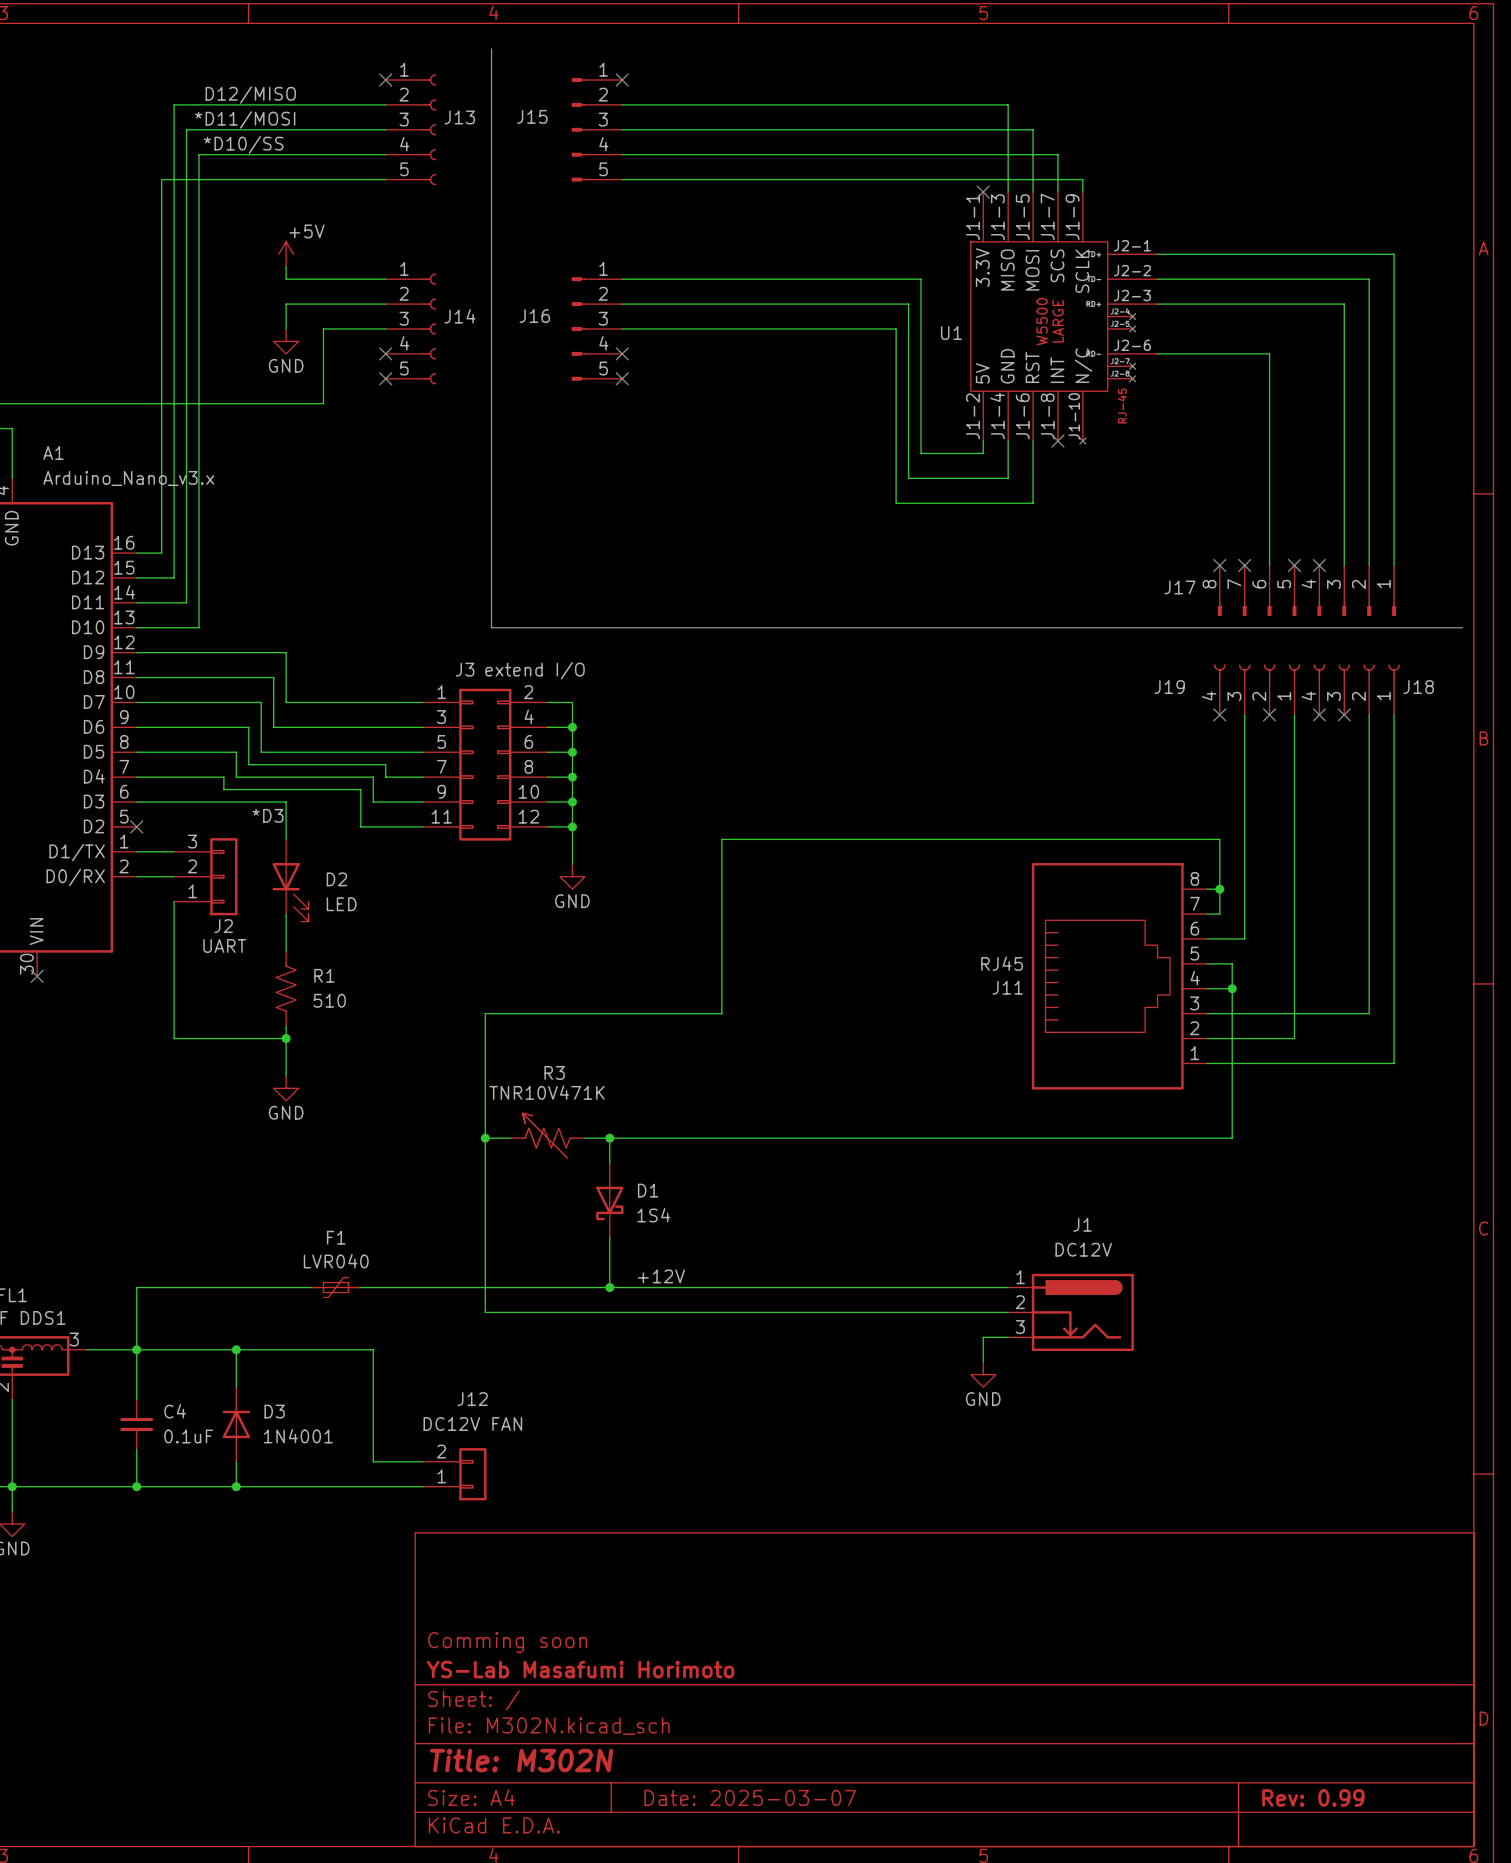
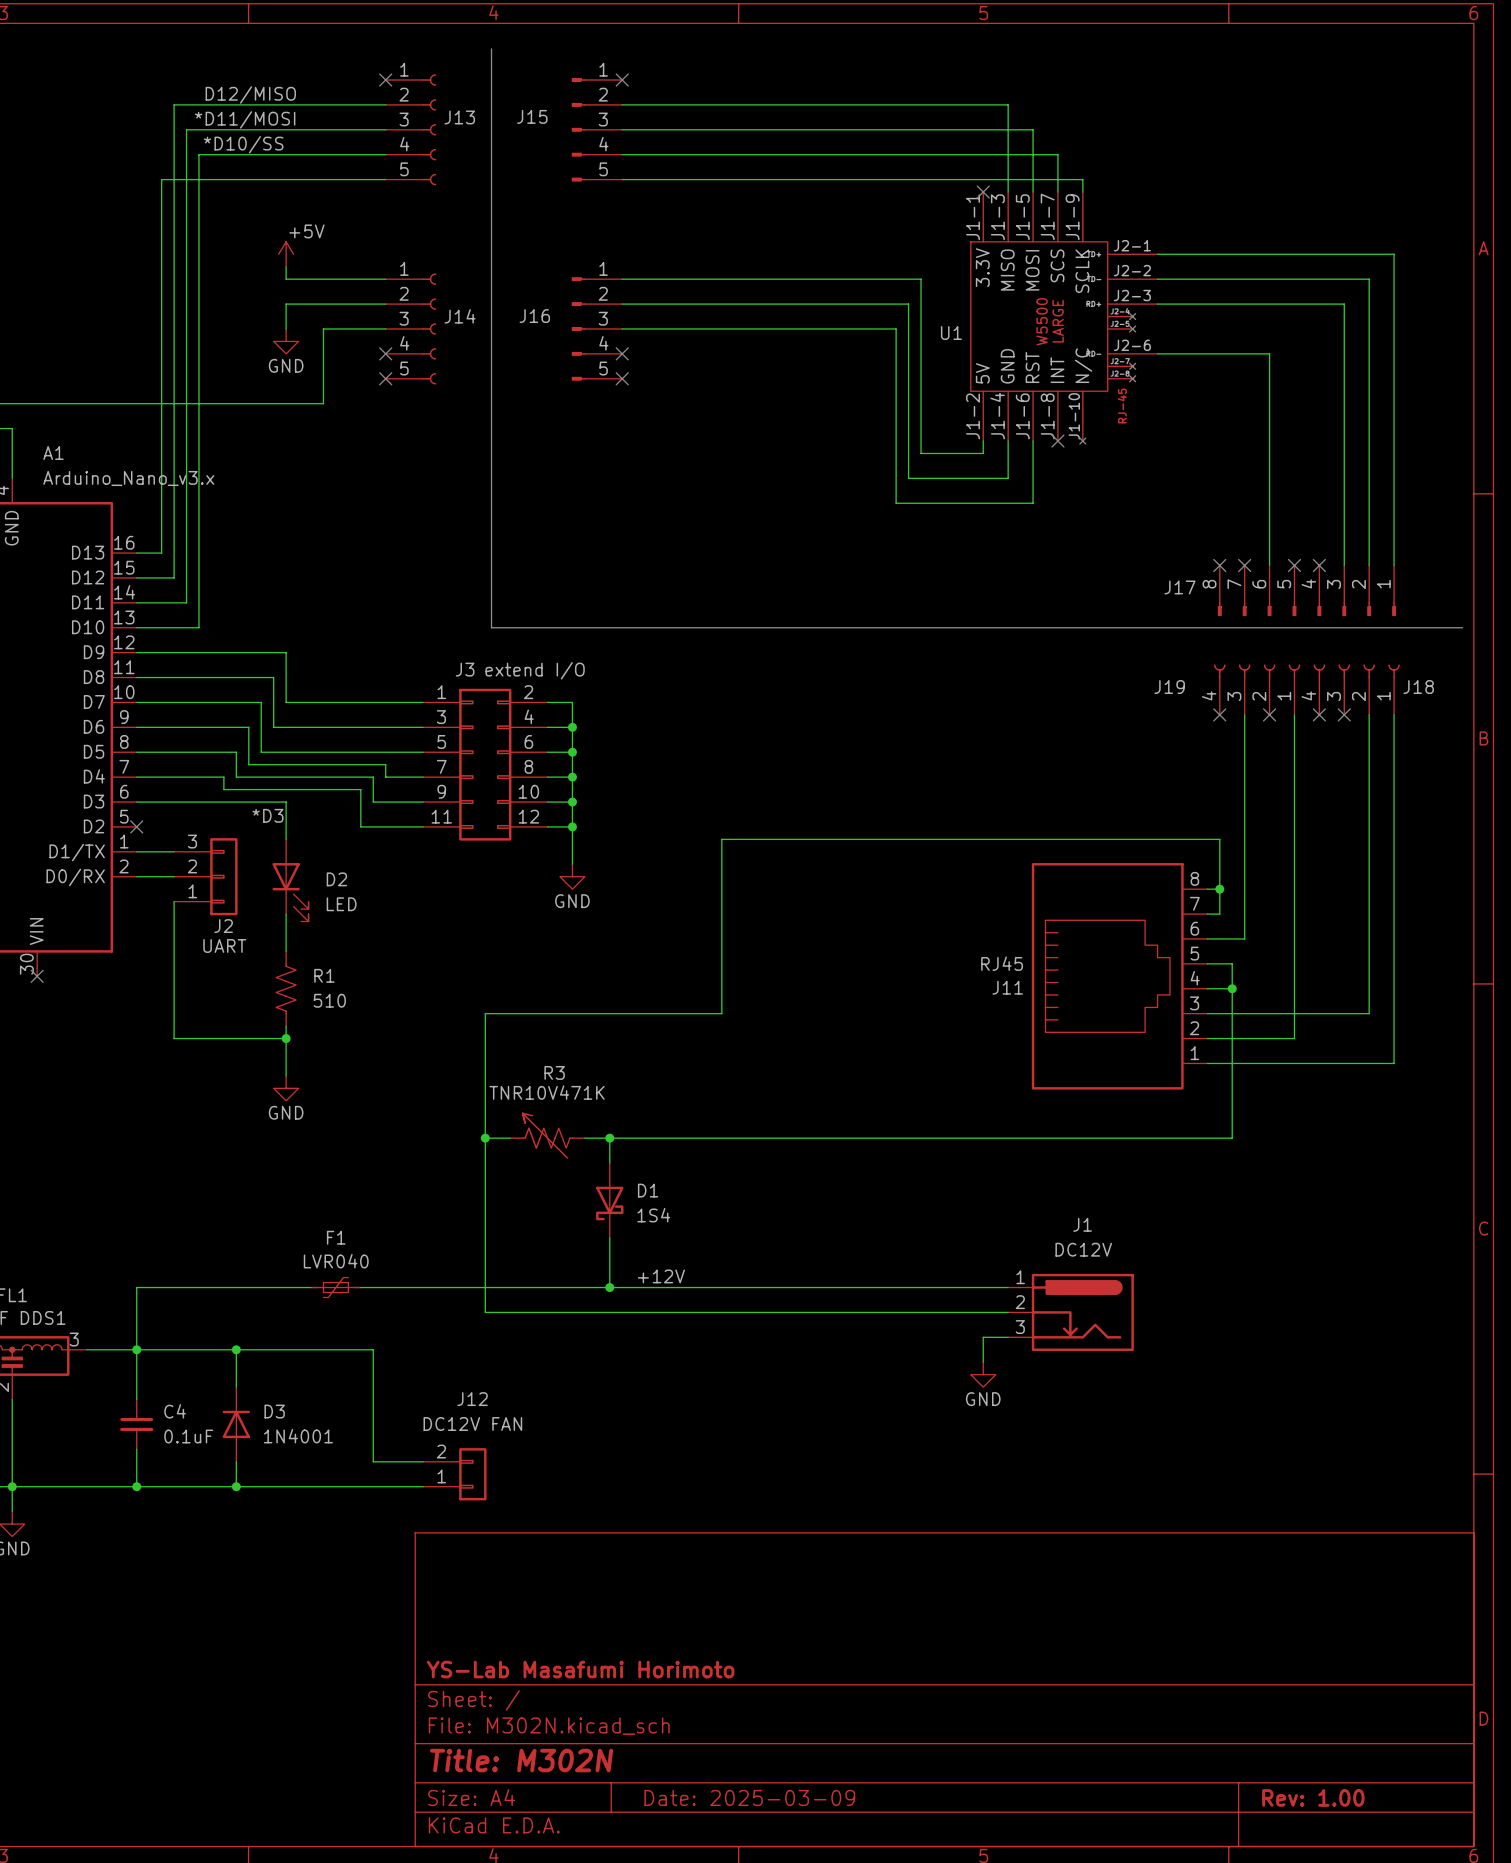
title block: Comming soon (507, 1642) -> none
title block: Date: 2025-03-07 (750, 1797) -> Date: 2025-03-09 (749, 1797)
title block: Rev: 0.99 (1313, 1797) -> Rev: 1.00 (1313, 1797)

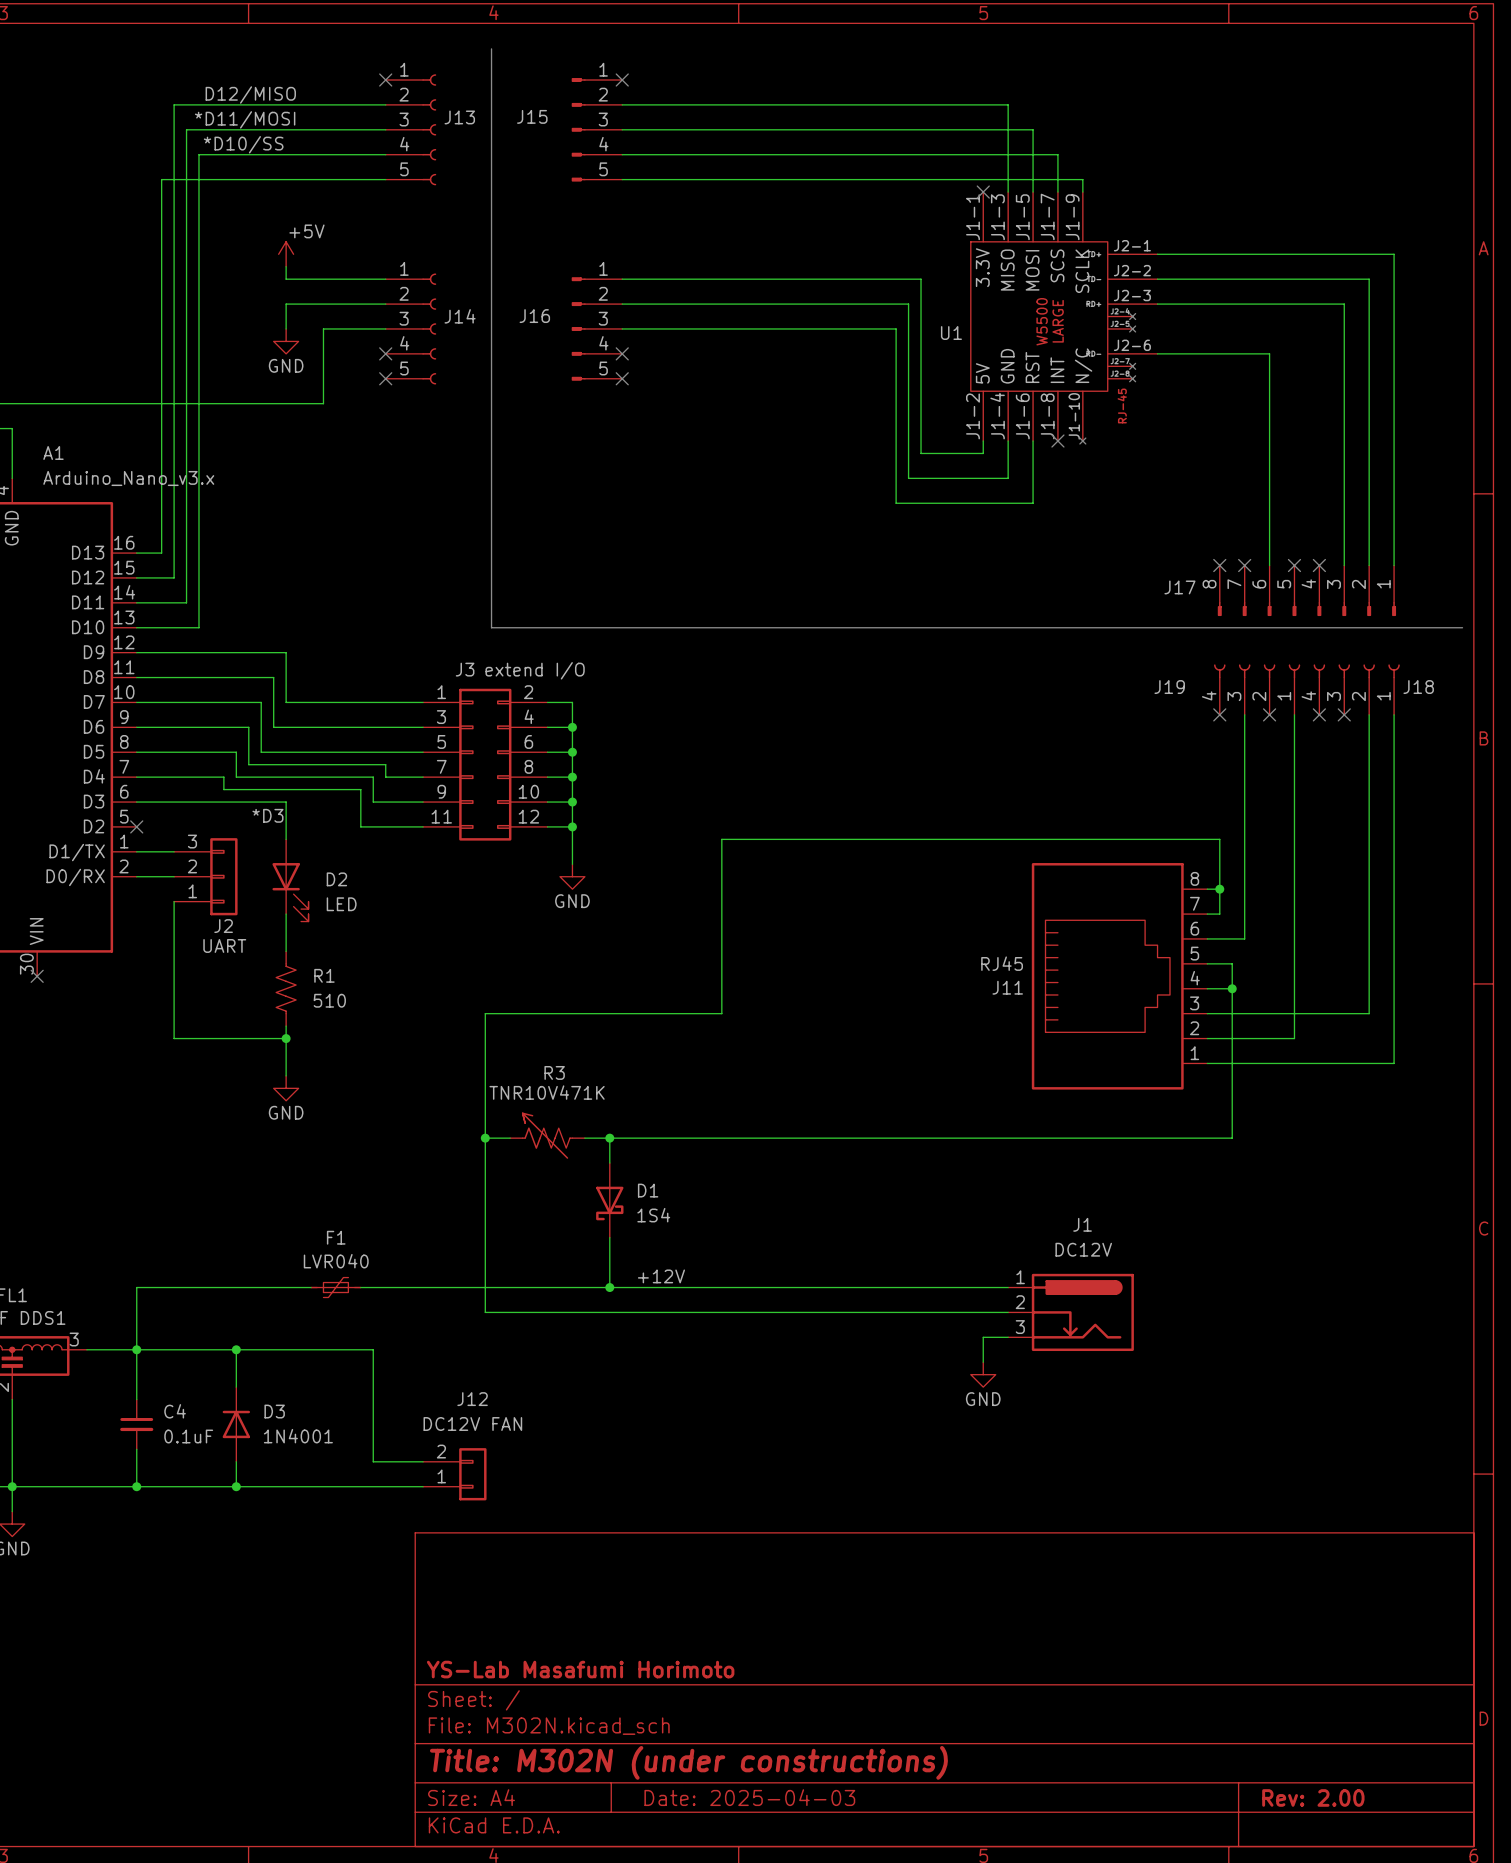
title block: Title: M302N (521, 1760) -> Title: M302N (under constructions) (688, 1762)
title block: Date: 2025-03-09 (749, 1797) -> Date: 2025-04-03 (749, 1797)
title block: Rev: 1.00 (1313, 1797) -> Rev: 2.00 (1313, 1797)

